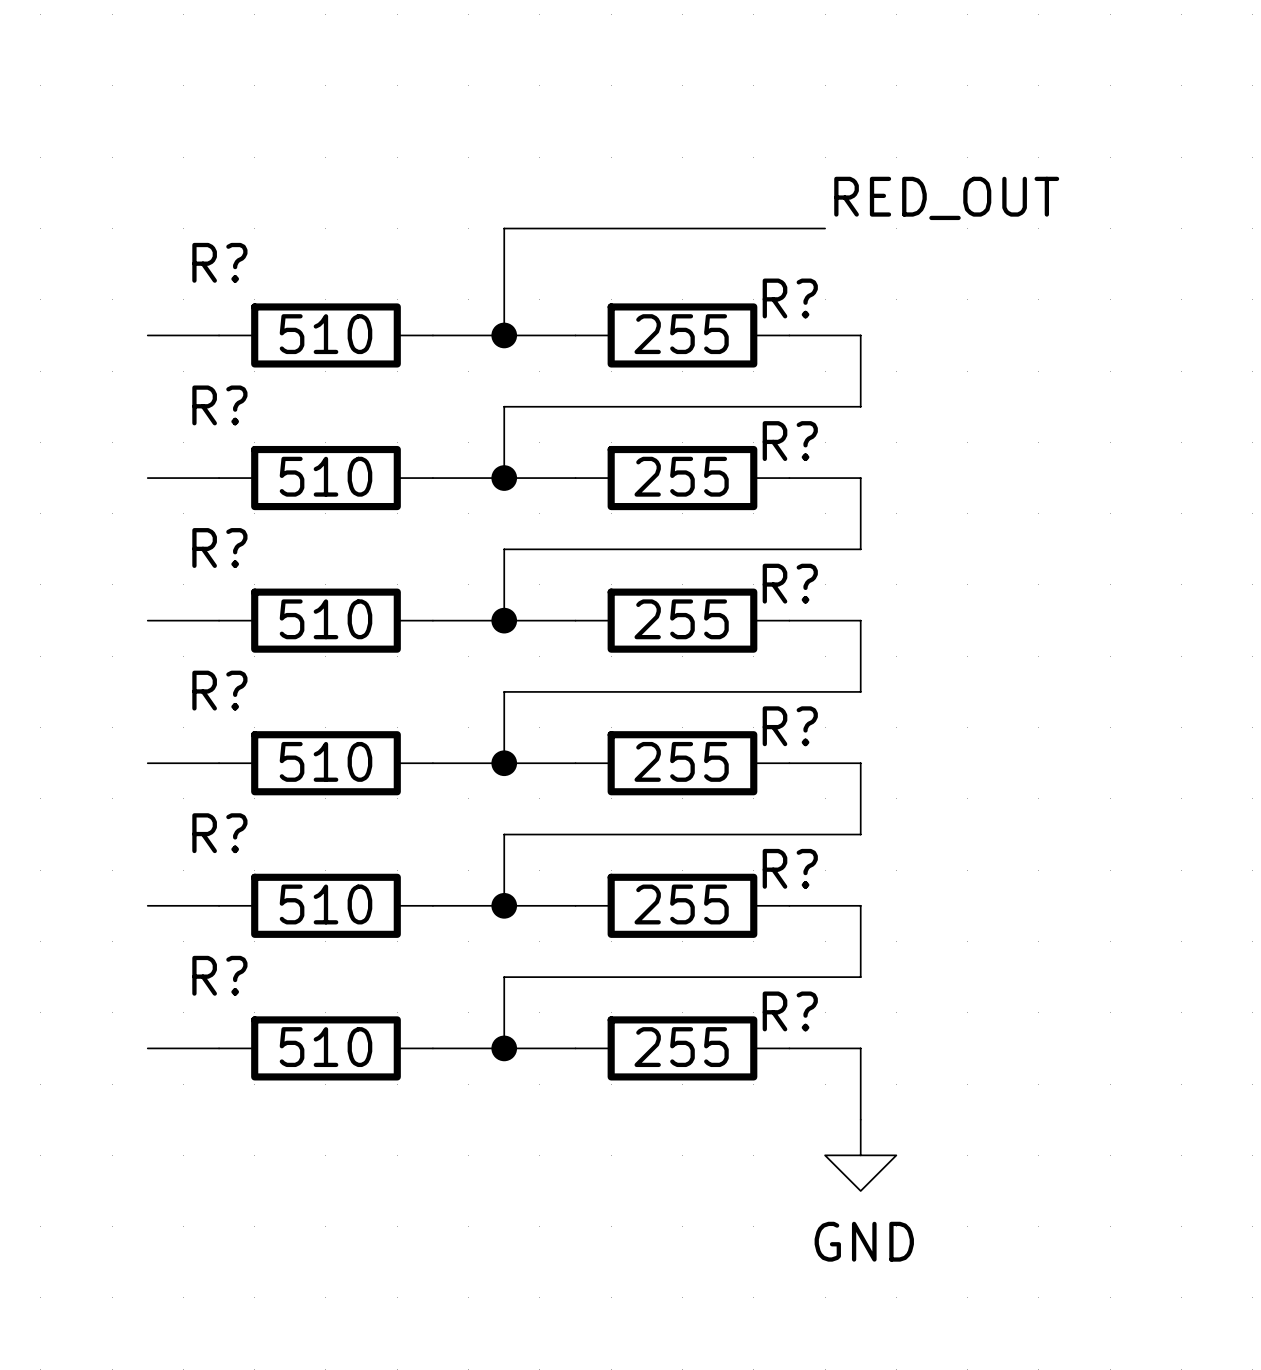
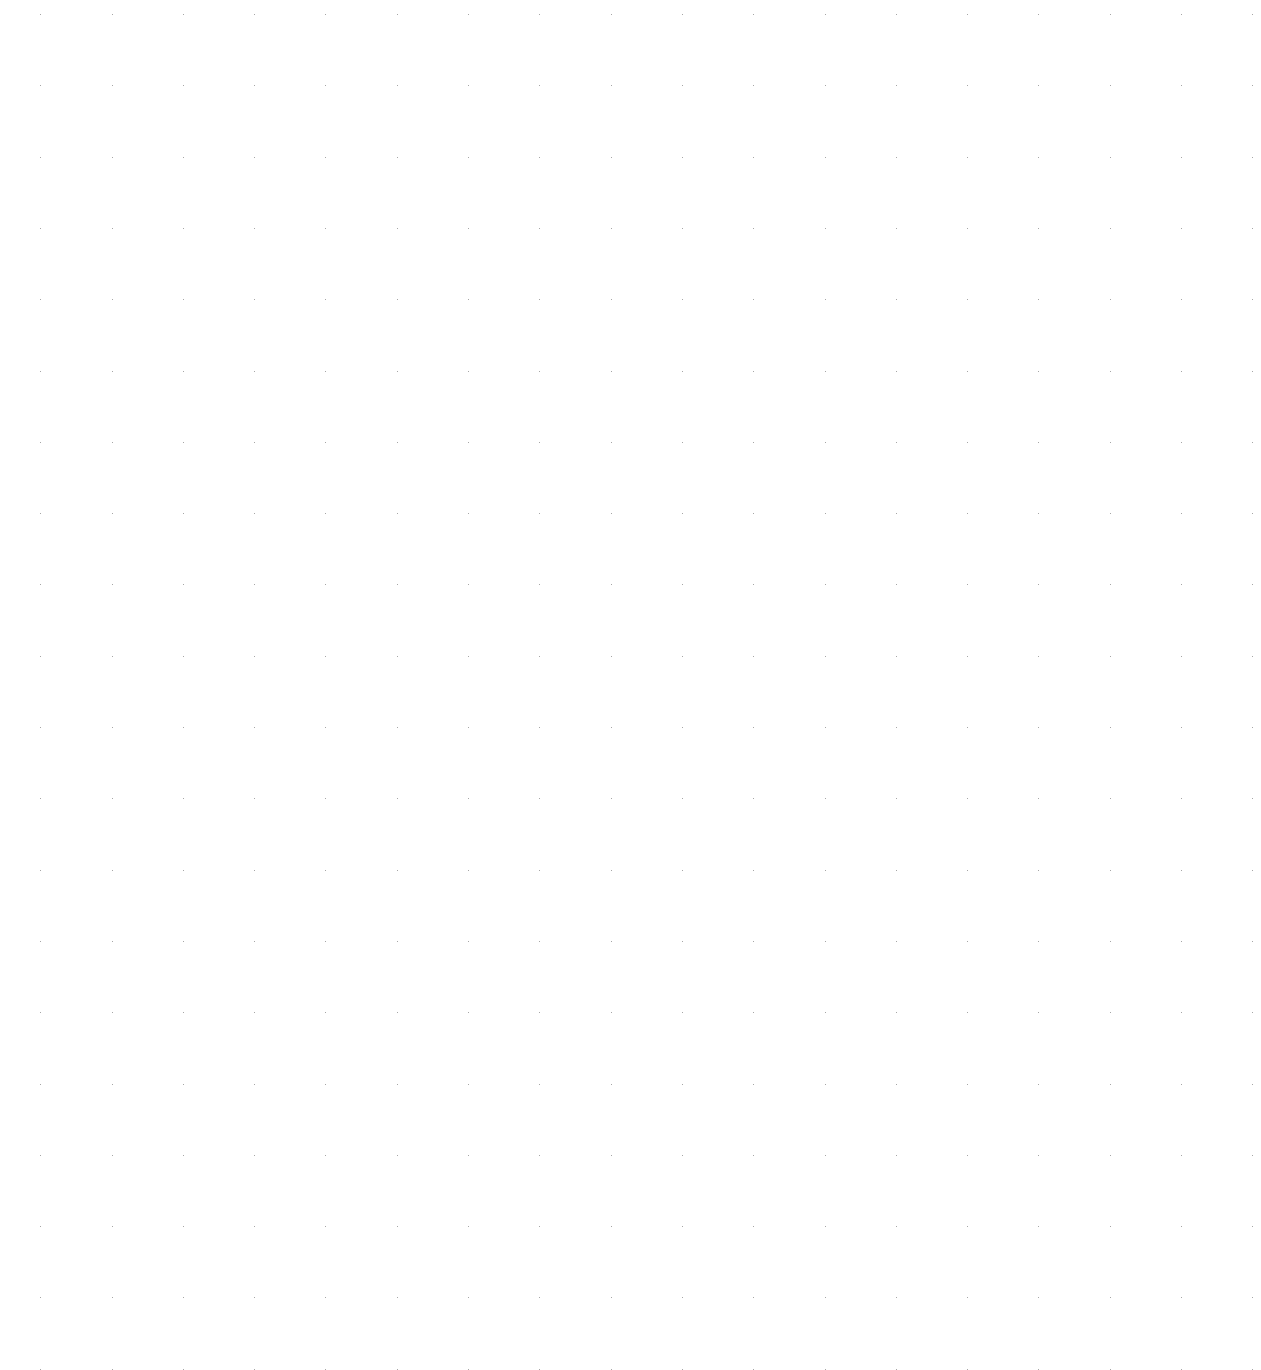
label: RED_OUT (946, 198) -> none
wire: (825, 228) (504, 228) (504, 335) -> none
wire: (147, 335) (219, 335) -> none
R?: 510 (325, 335) -> none
wire: (432, 335) (575, 335) -> none
junction: (504, 335) -> none
R?: 255 (682, 335) -> none
wire: (789, 335) (860, 335) (860, 406) (504, 406) (504, 478) -> none
wire: (147, 478) (219, 478) -> none
R?: 510 (325, 478) -> none
wire: (432, 478) (575, 478) -> none
junction: (504, 478) -> none
R?: 255 (682, 478) -> none
wire: (789, 478) (860, 478) (860, 549) (504, 549) (504, 620) -> none
wire: (147, 620) (219, 620) -> none
R?: 510 (325, 620) -> none
wire: (432, 620) (575, 620) -> none
junction: (504, 620) -> none
R?: 255 (682, 620) -> none
wire: (789, 620) (860, 620) (860, 691) (504, 691) (504, 763) -> none
wire: (147, 763) (219, 763) -> none
R?: 510 (325, 763) -> none
wire: (432, 763) (575, 763) -> none
junction: (504, 763) -> none
R?: 255 (682, 763) -> none
wire: (789, 763) (860, 763) (860, 834) (504, 834) (504, 905) -> none
wire: (147, 905) (219, 905) -> none
R?: 510 (325, 905) -> none
wire: (432, 905) (575, 905) -> none
junction: (504, 905) -> none
R?: 255 (682, 905) -> none
wire: (789, 905) (860, 905) (860, 977) (504, 977) (504, 1048) -> none
wire: (147, 1048) (219, 1048) -> none
R?: 510 (325, 1048) -> none
wire: (432, 1048) (575, 1048) -> none
junction: (504, 1048) -> none
R?: 255 (682, 1048) -> none
wire: (789, 1048) (860, 1048) (860, 1119) -> none
power symbol: GND (860, 1155) -> none

